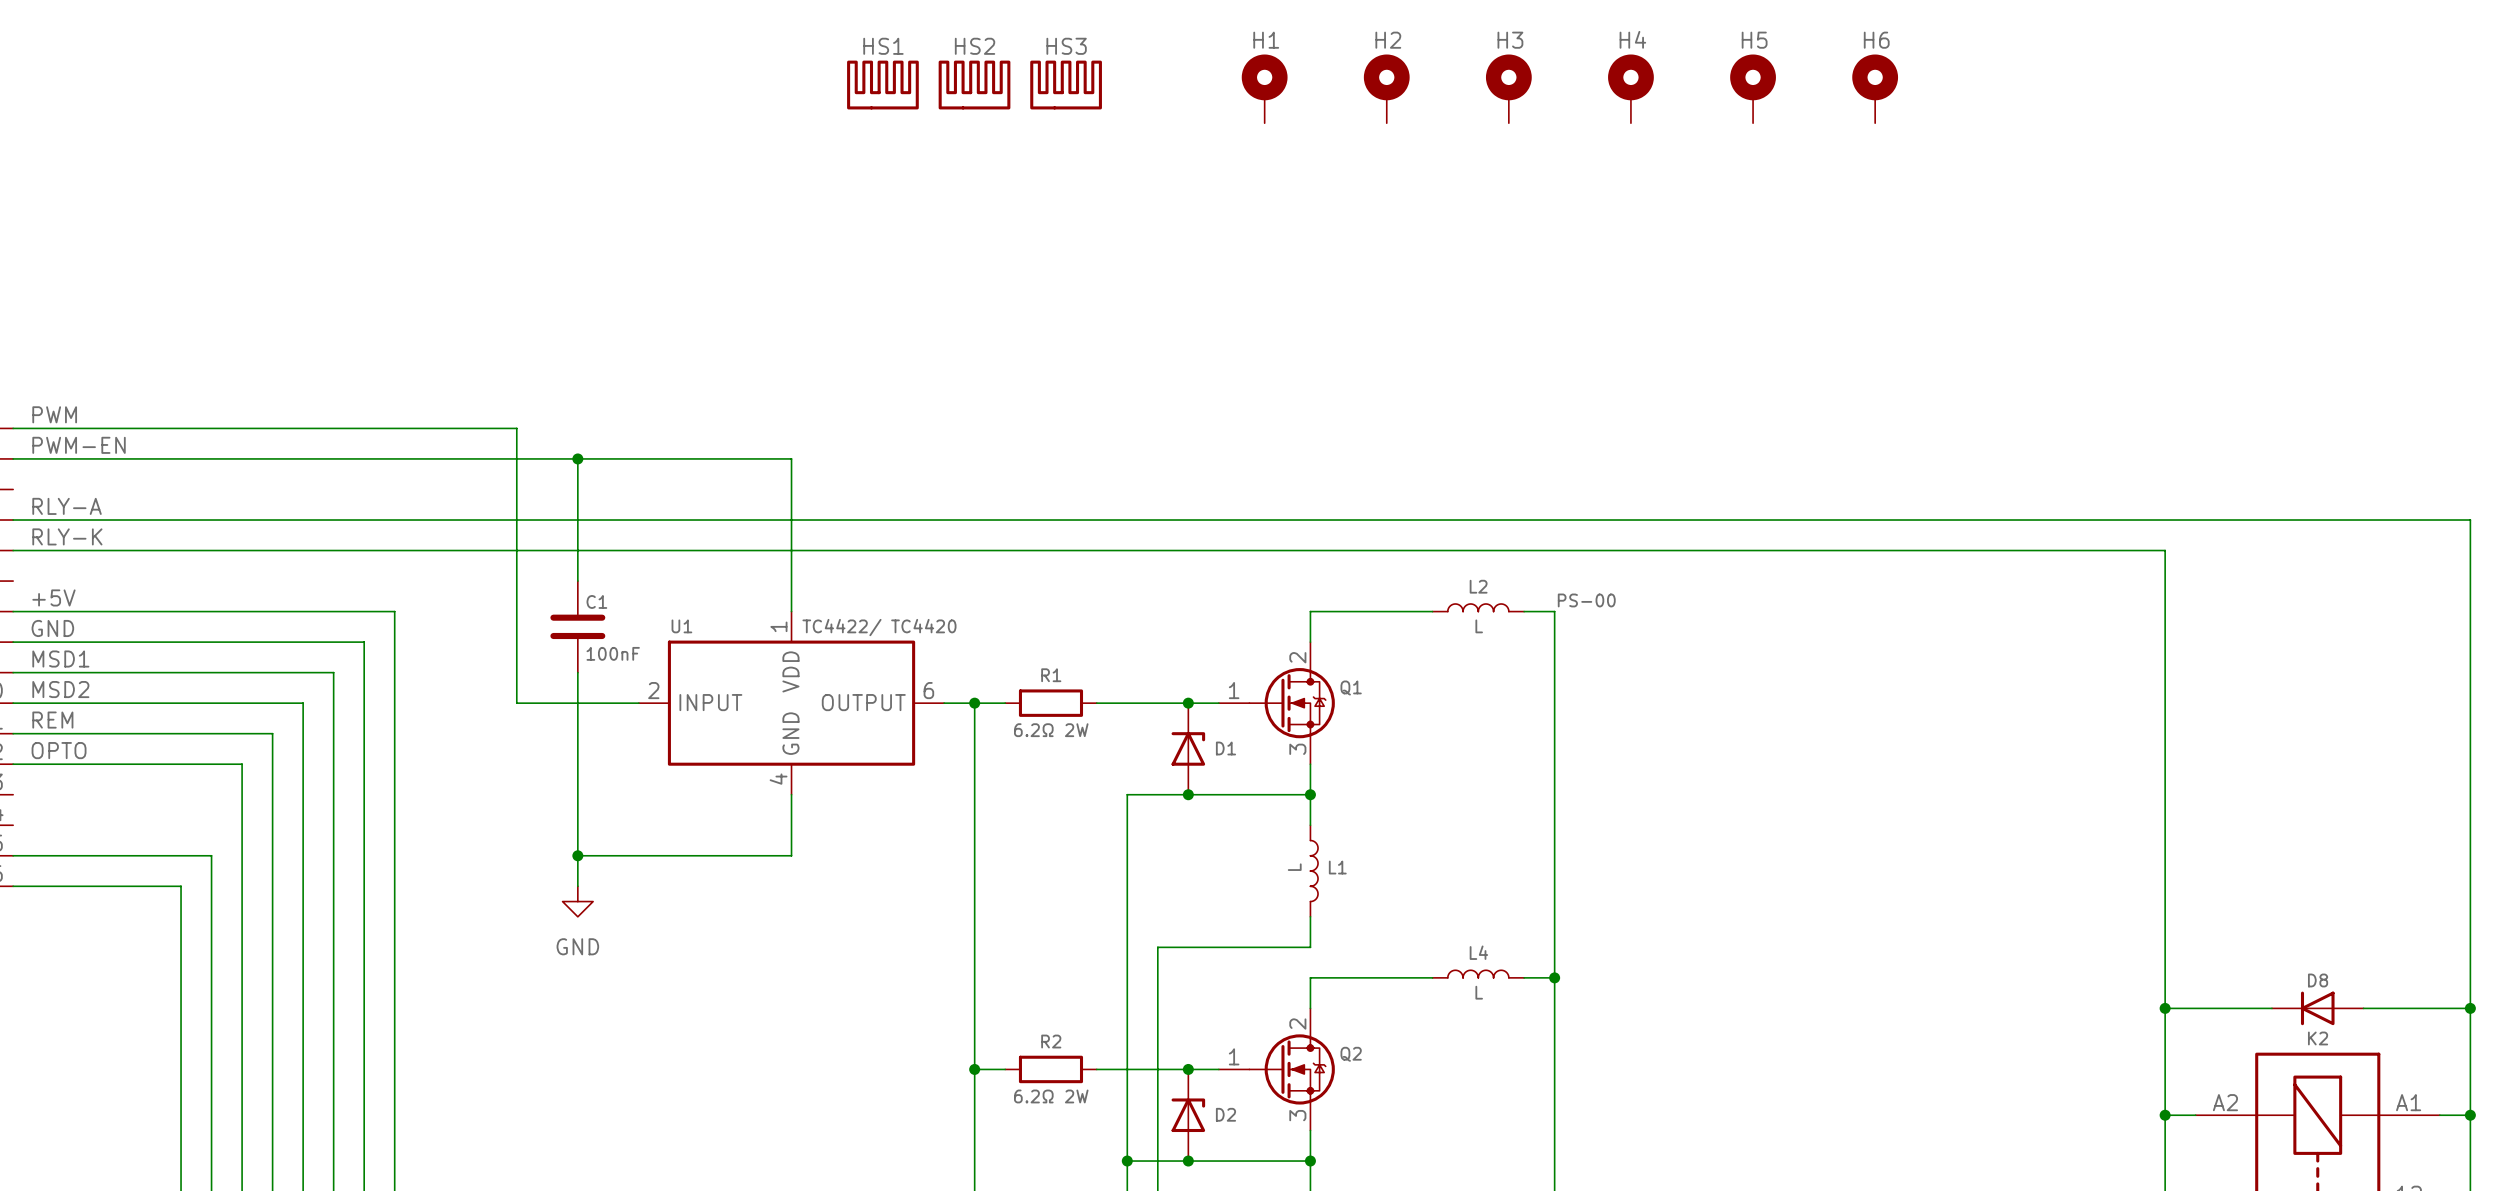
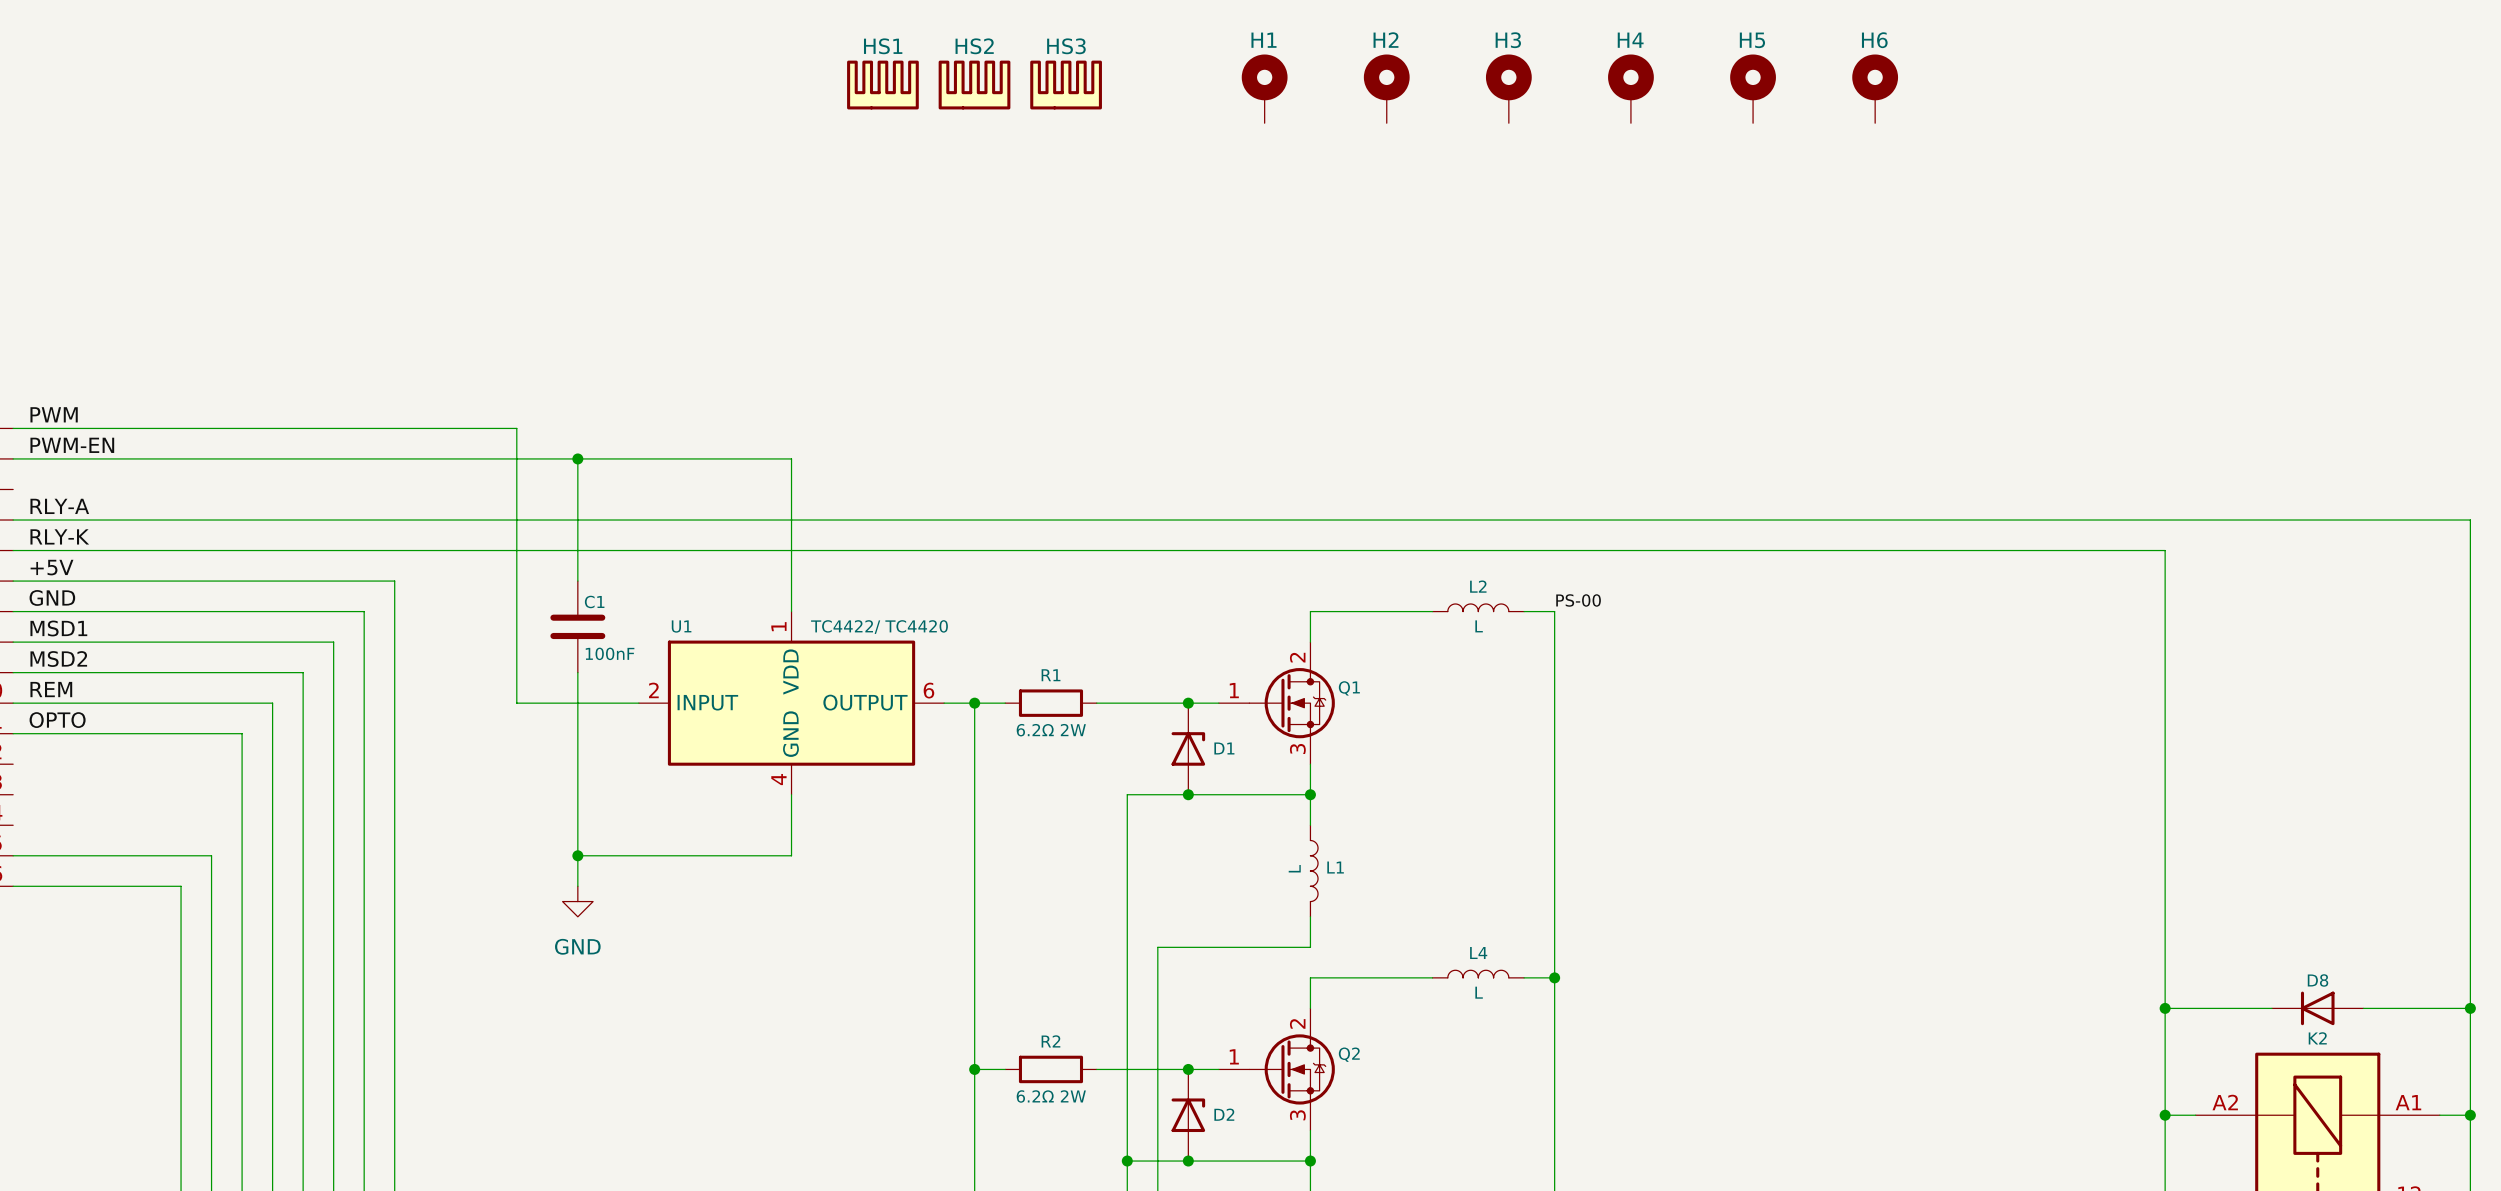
label: none -> +5V (52, 567)
wire: none -> (13, 581) (394, 581) (394, 611)
label: +5V (53, 597) -> GND (52, 597)
wire: (364, 611) (394, 611) -> (364, 611) (364, 642)
label: GND (52, 628) -> MSD1 (58, 628)
wire: (333, 642) (364, 642) -> (333, 642) (333, 672)
label: MSD1 (60, 659) -> MSD2 (58, 659)
wire: (303, 672) (333, 672) -> (303, 672) (303, 703)
label: MSD2 (60, 689) -> REM (51, 689)
wire: (272, 703) (303, 703) -> (272, 703) (272, 733)
label: REM (52, 720) -> OPTO (57, 720)
wire: (242, 733) (272, 733) -> (242, 733) (242, 764)
label: OPTO (59, 750) -> none
wire: (13, 764) (242, 764) -> none

